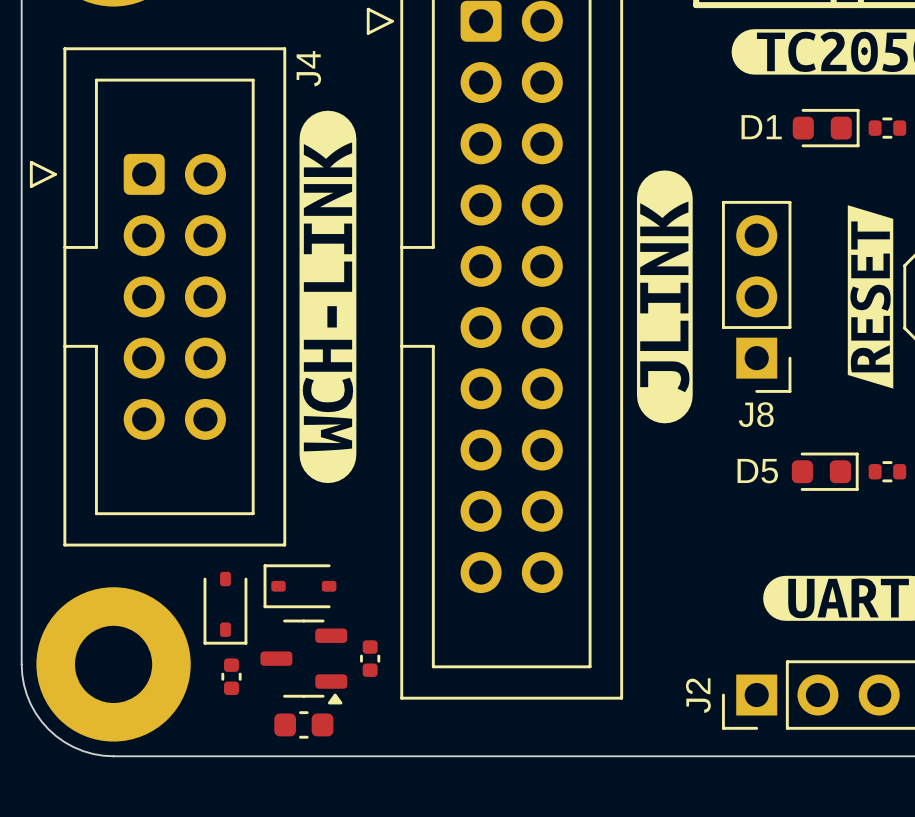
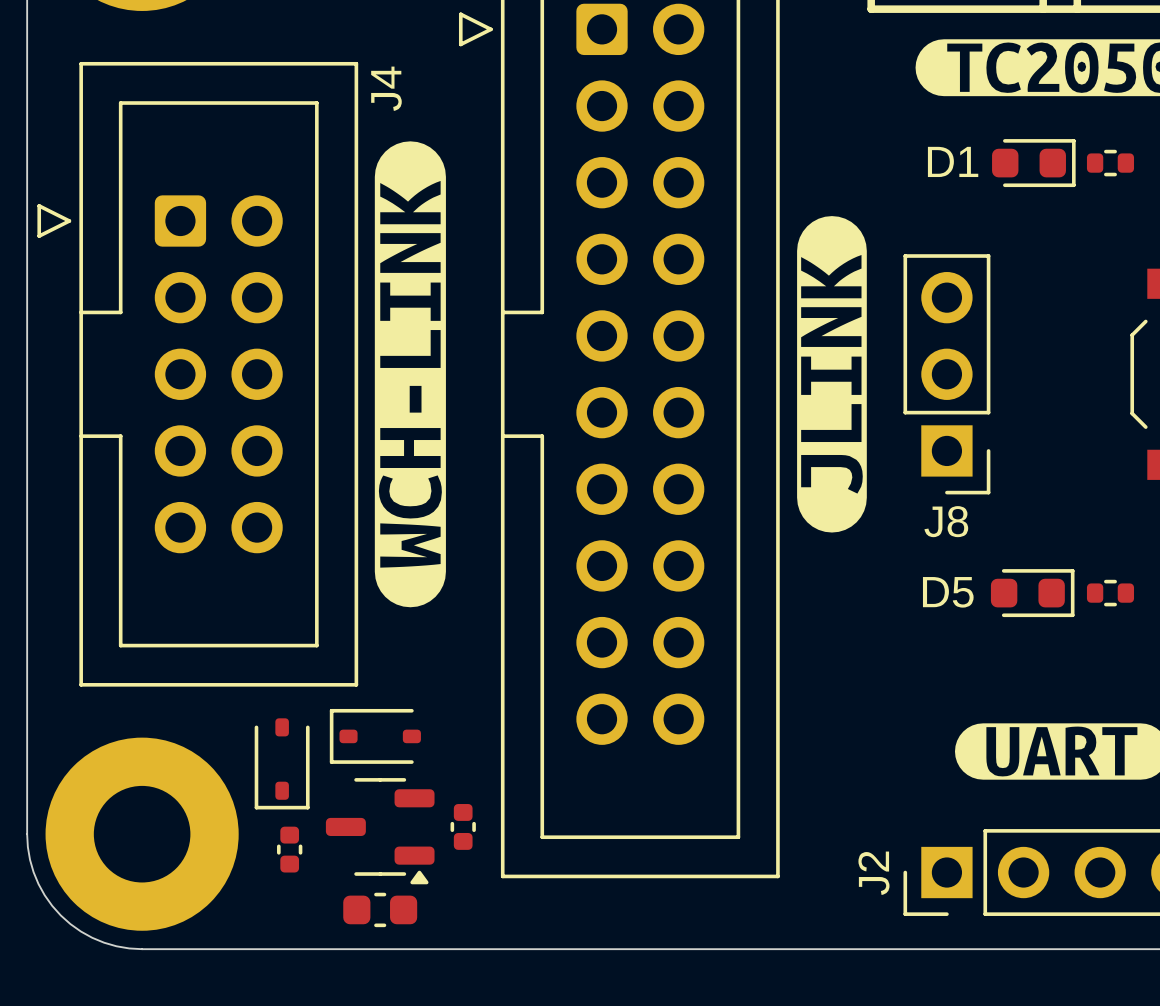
drawing: [847, 205, 894, 389] -> none

